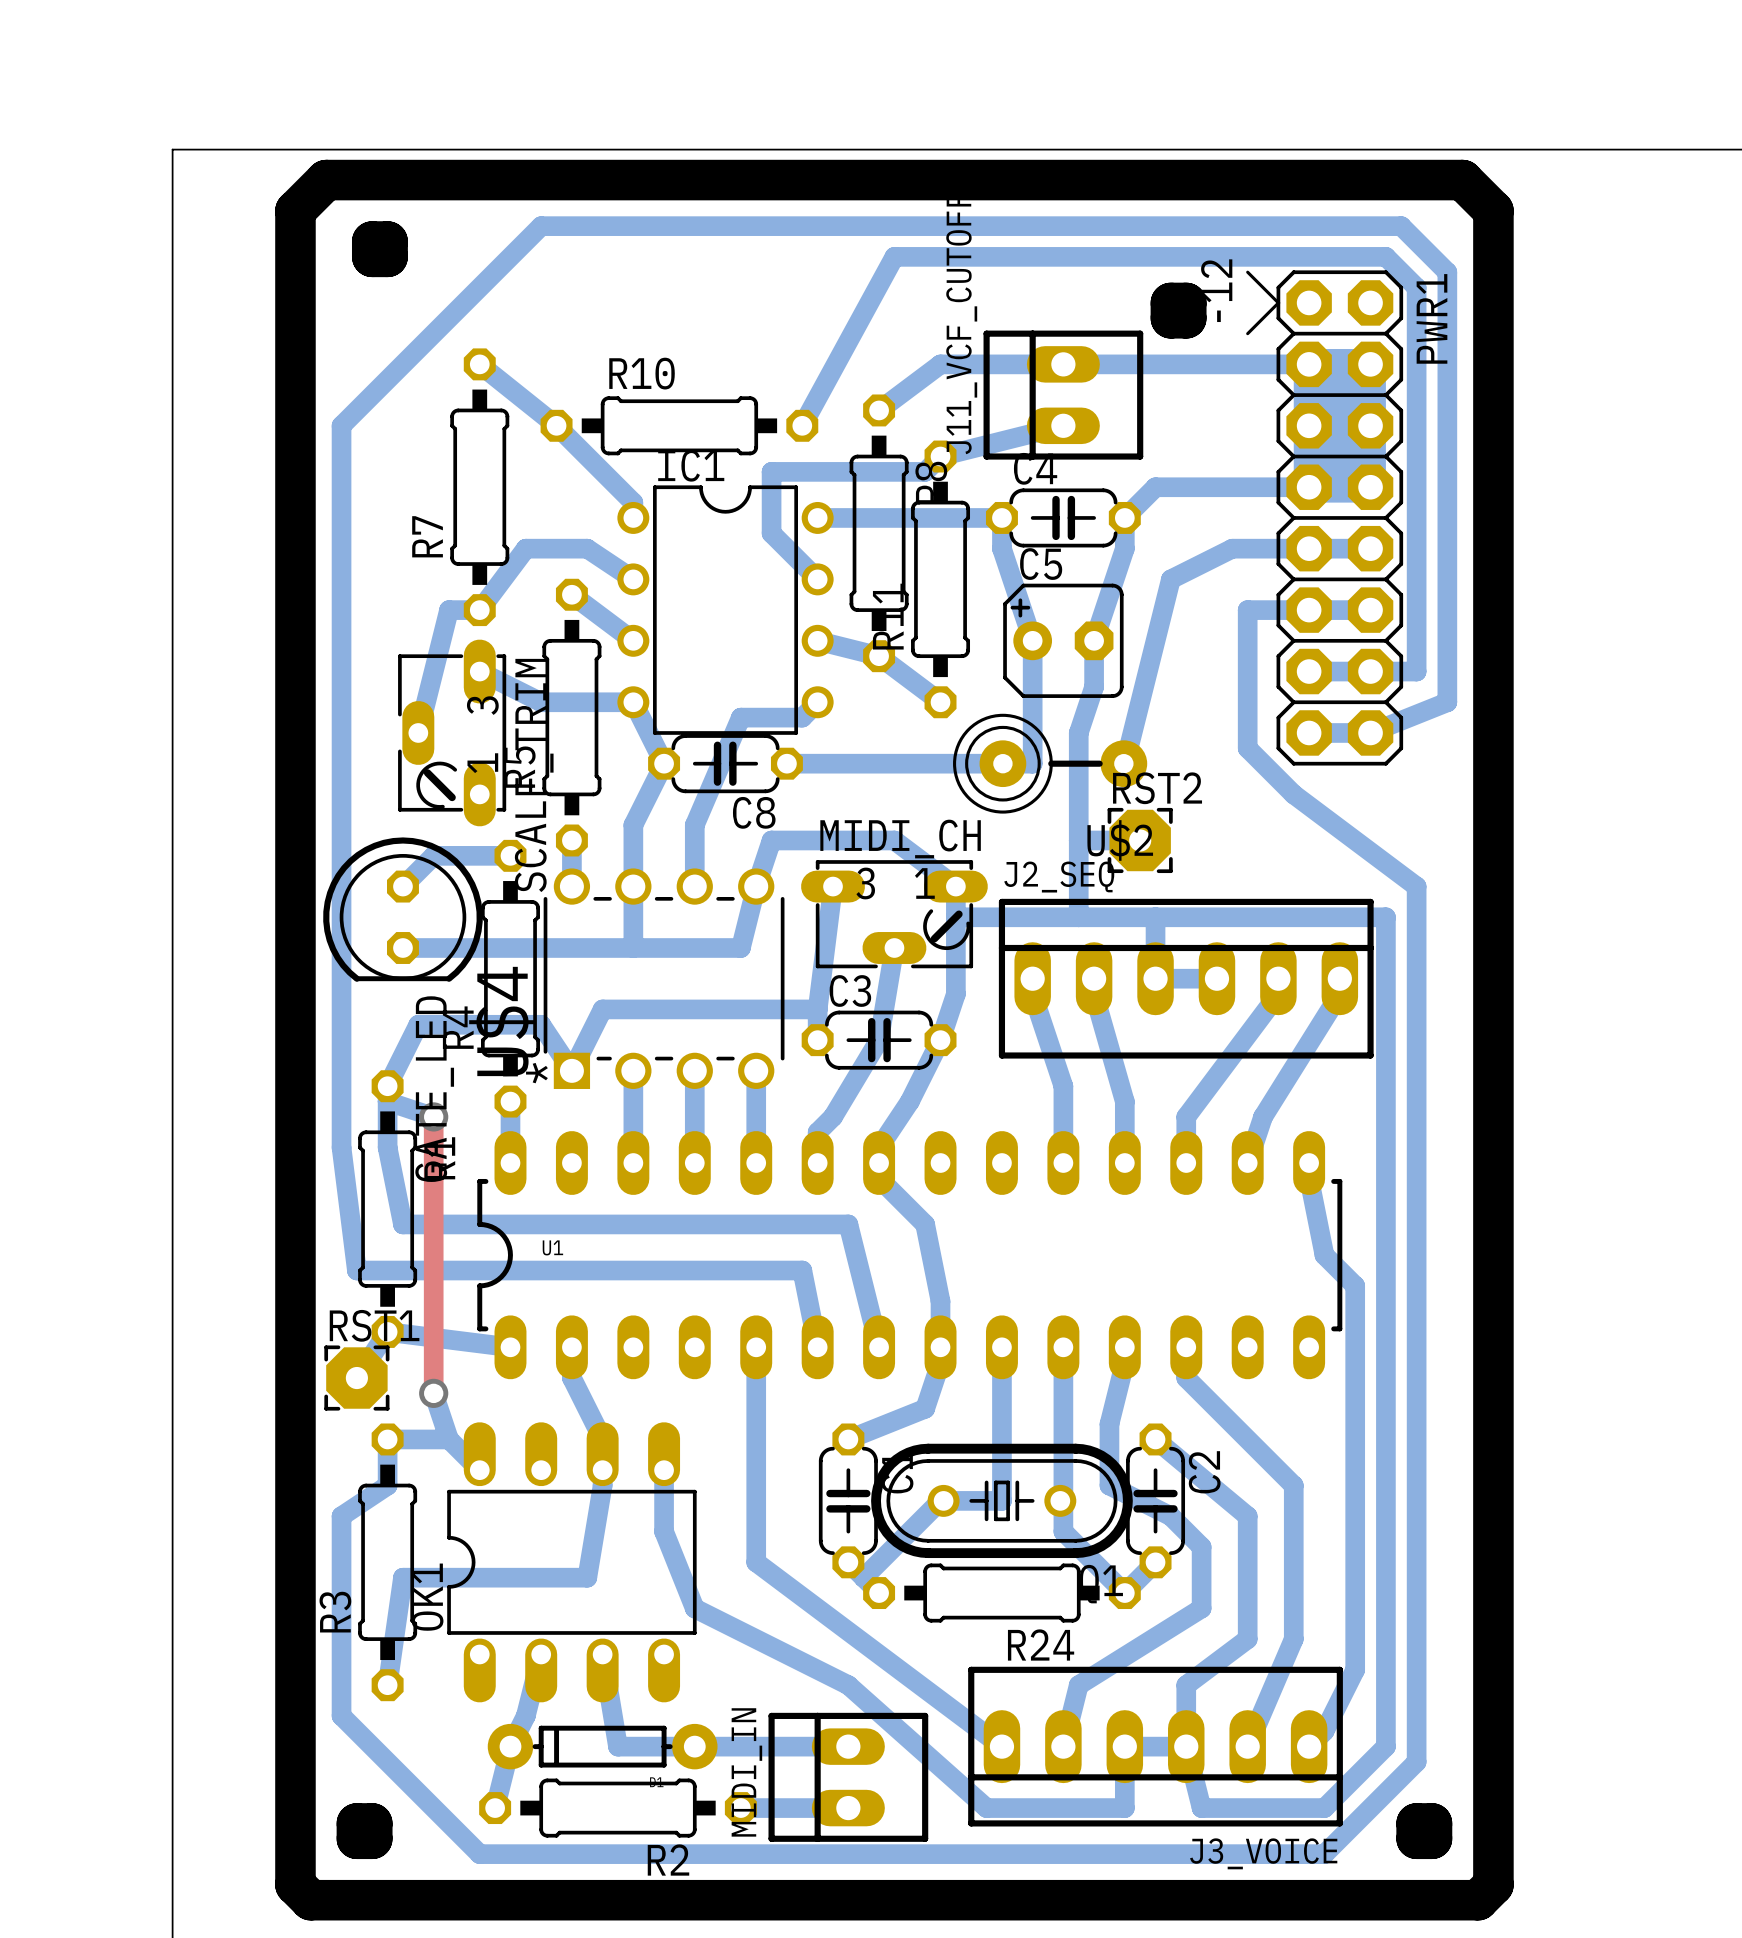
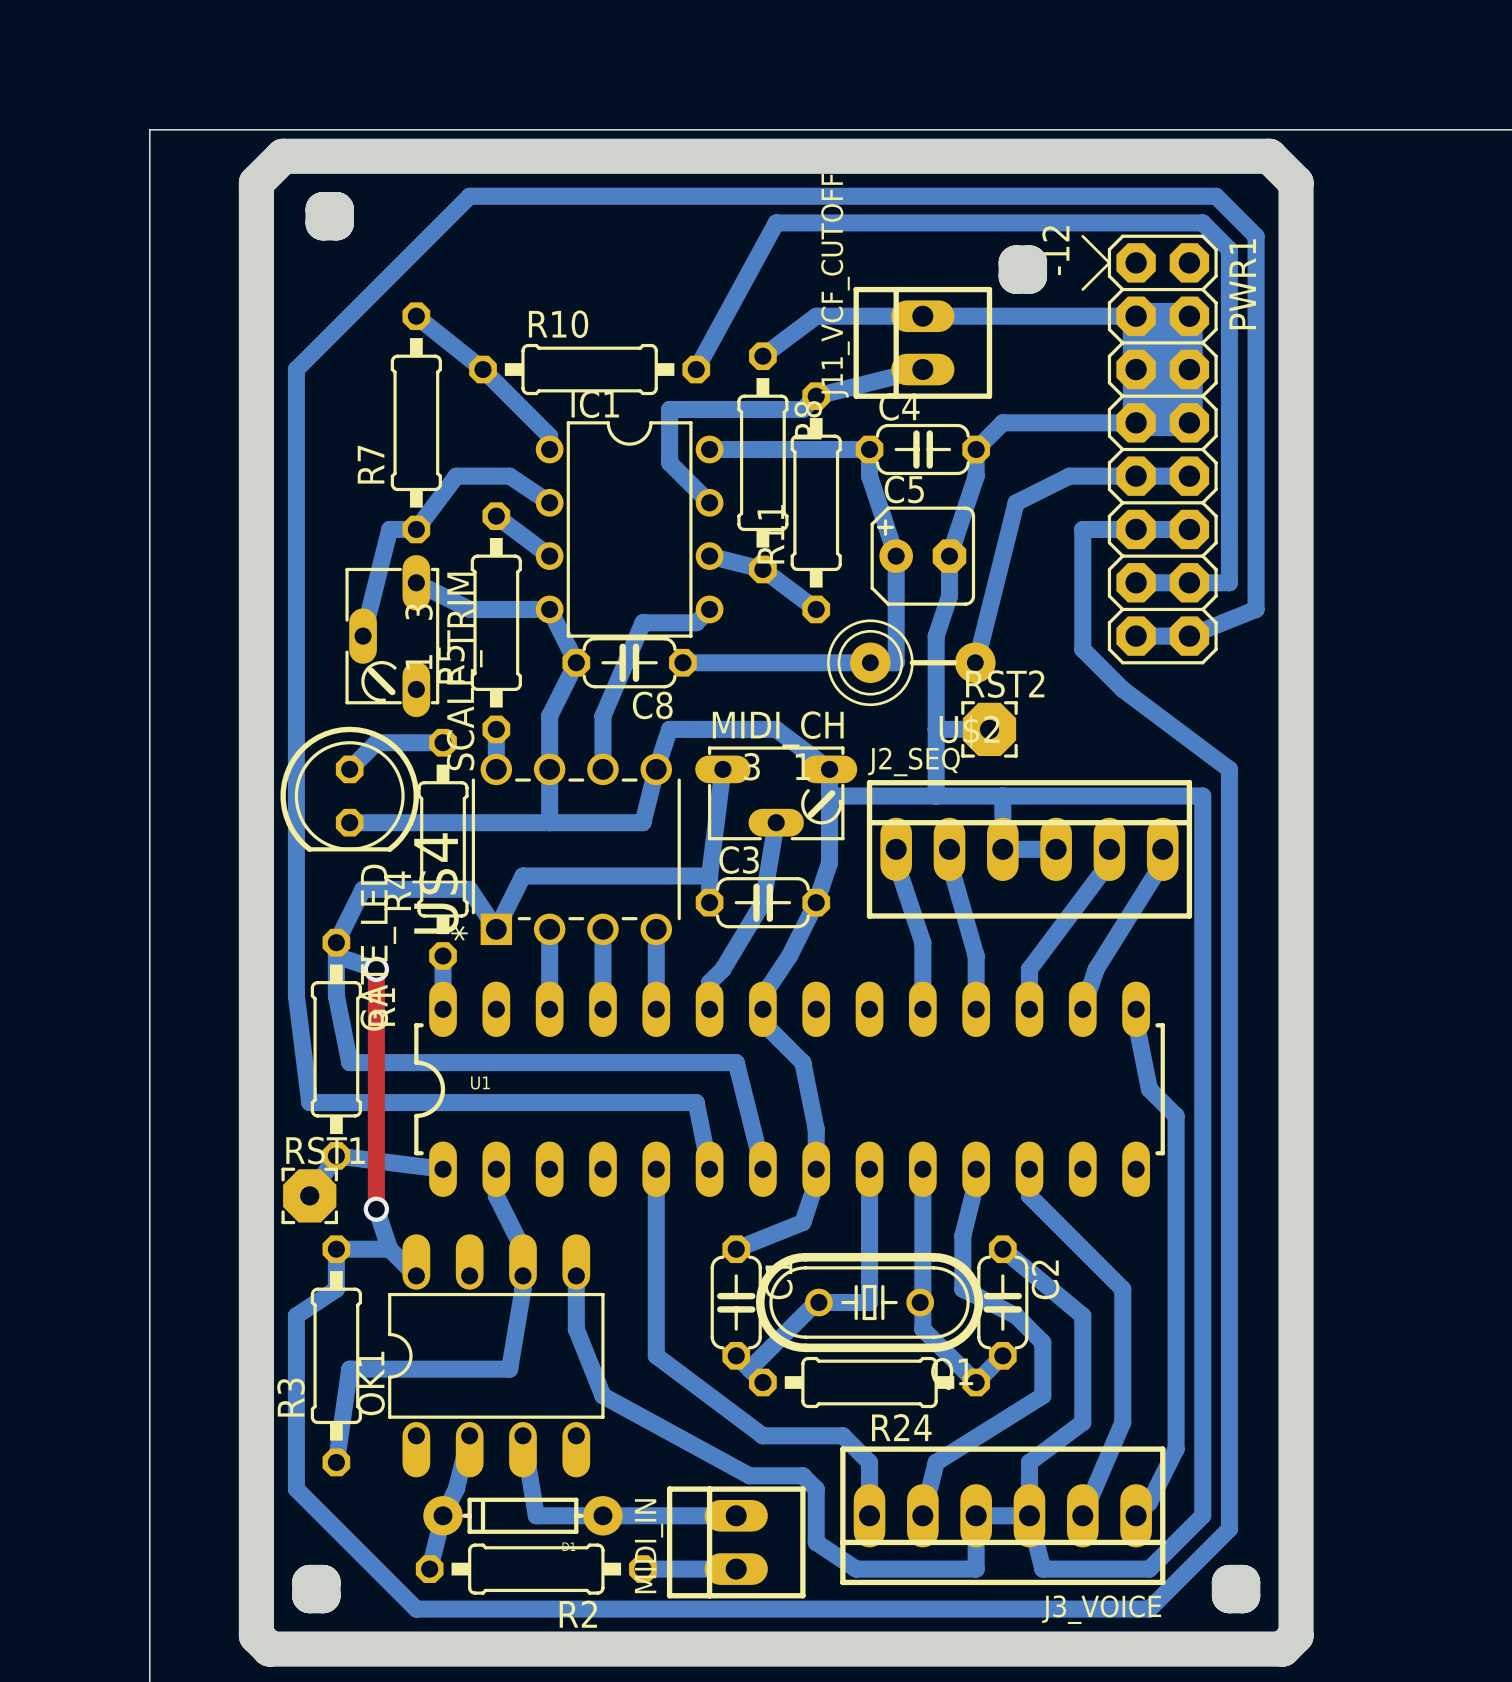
bottom track: (694, 1608) (848, 1685) (986, 1808) -> (602, 1395) (749, 1475) (802, 1475) (816, 1489) (816, 1542) (856, 1569)
bottom track: (879, 1654) (1001, 1746) -> (762, 1435) (842, 1435) (869, 1462) (869, 1515)

